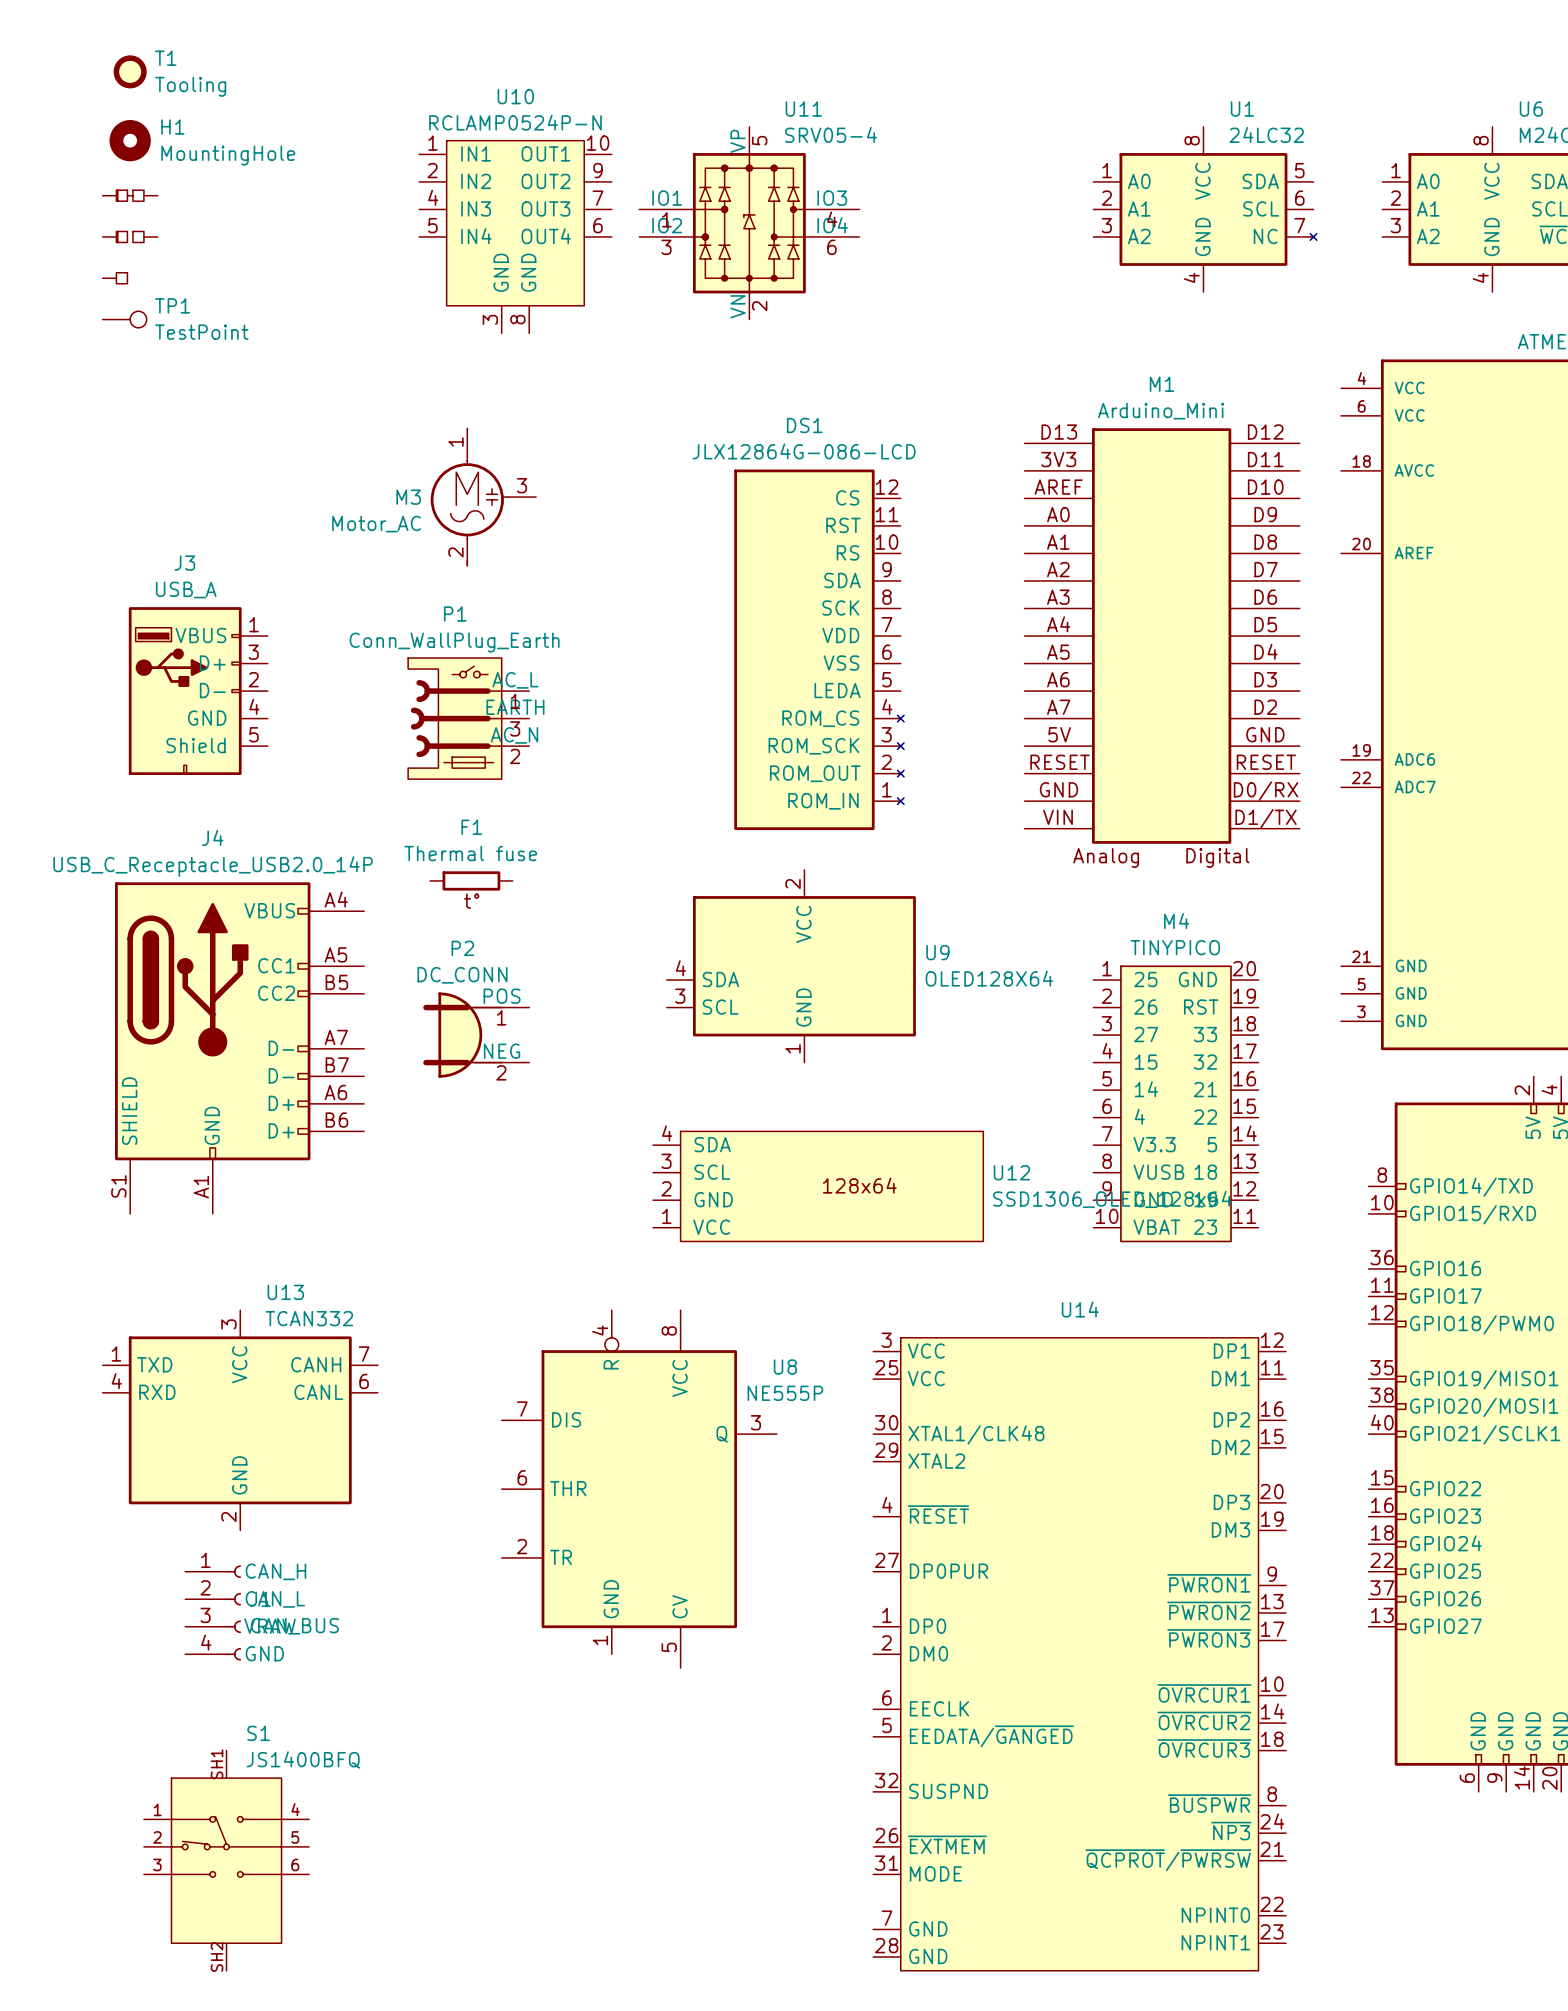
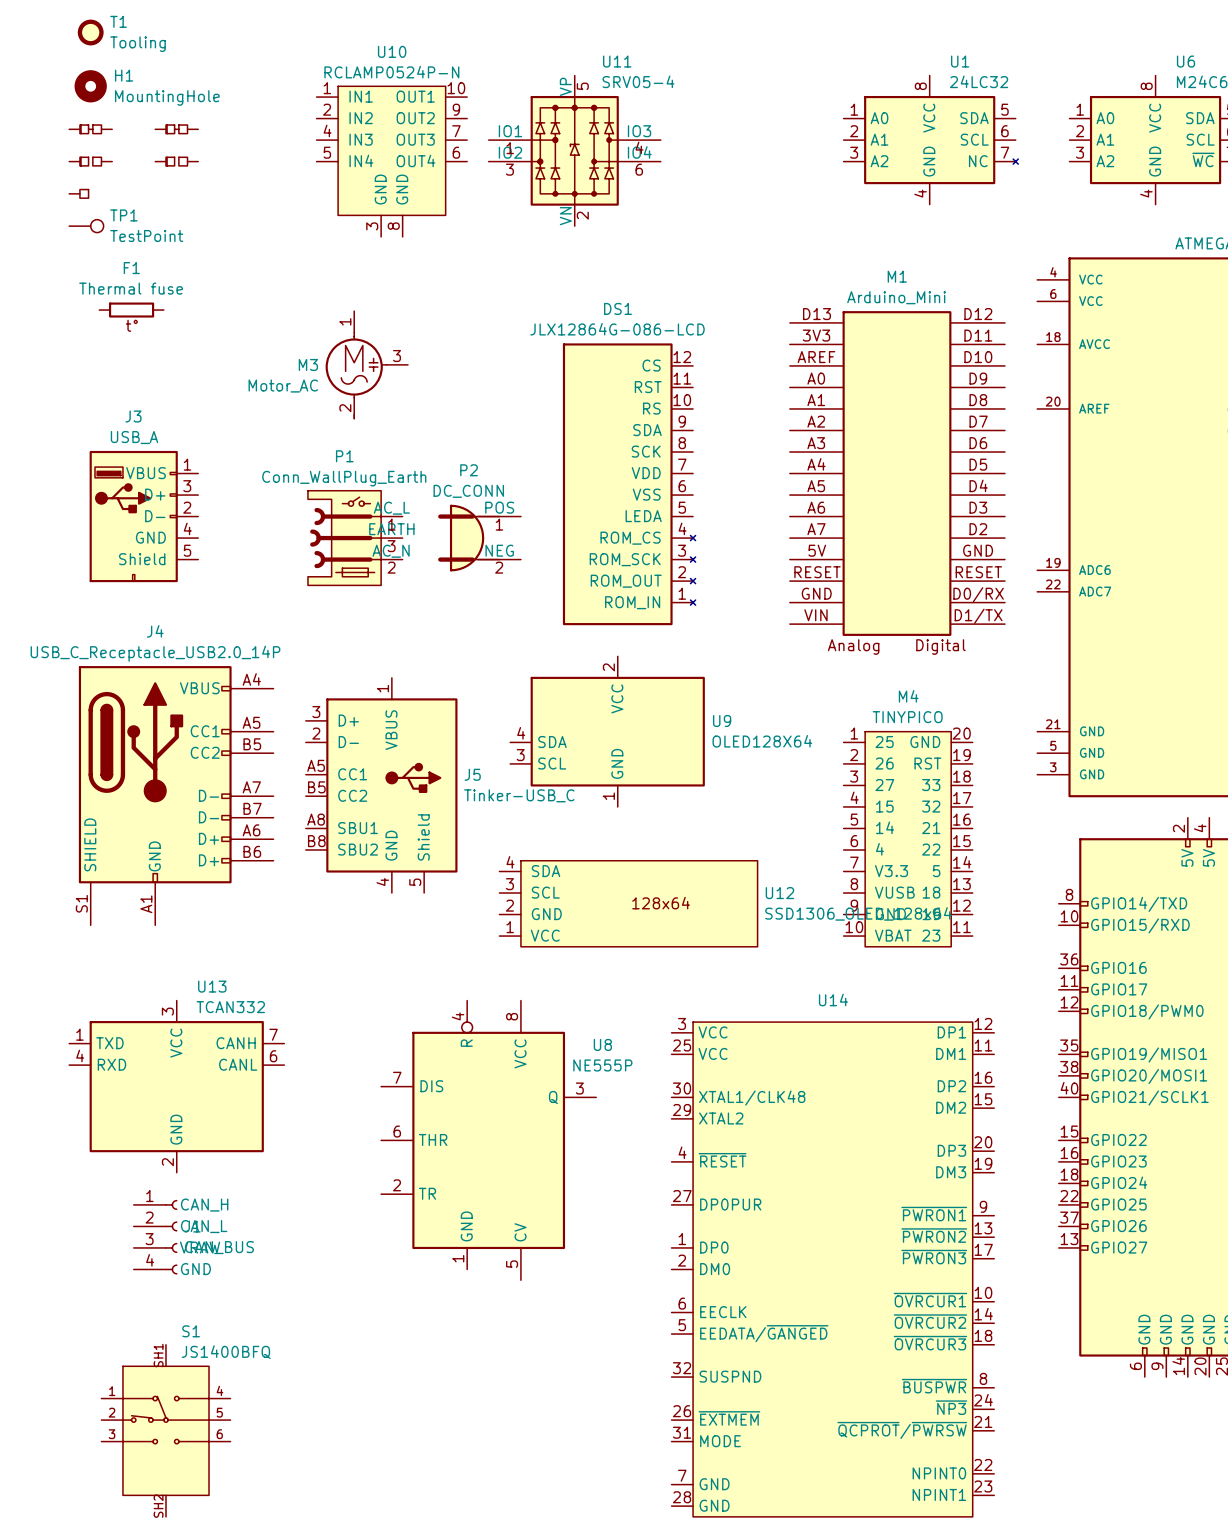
part: none -> (176, 129)
part: none -> (176, 161)
F1 position: (471, 880) -> (131, 310)
P2 position: (476, 1035) -> (479, 538)
J5: none -> Tinker-USB_C (381, 785)

